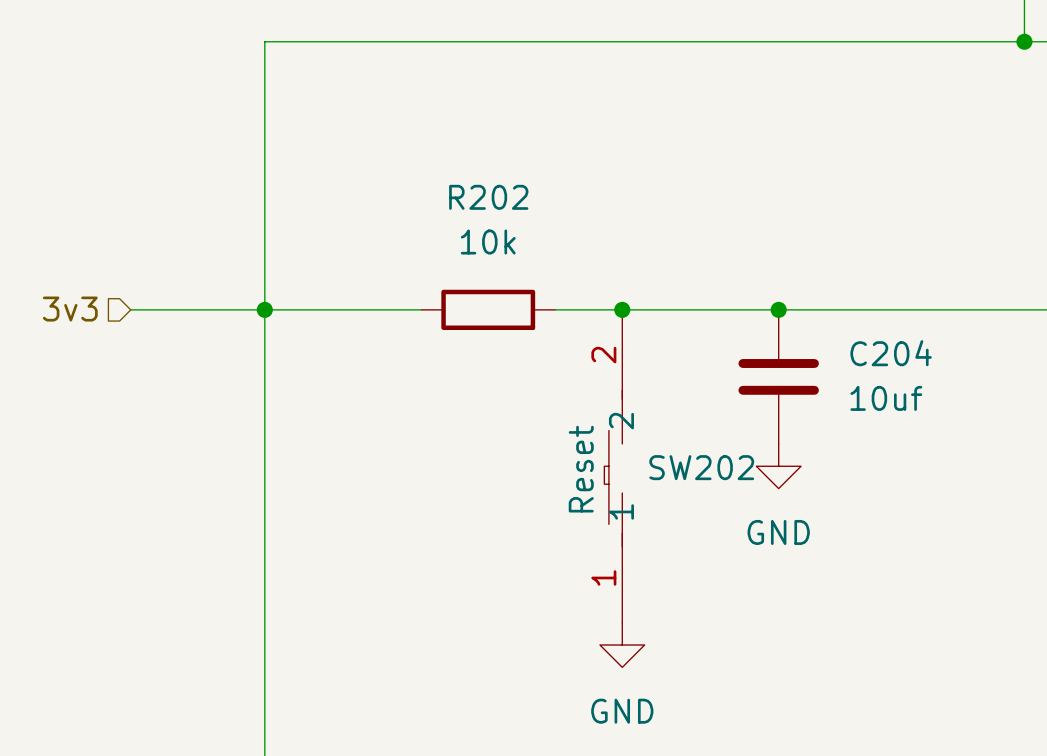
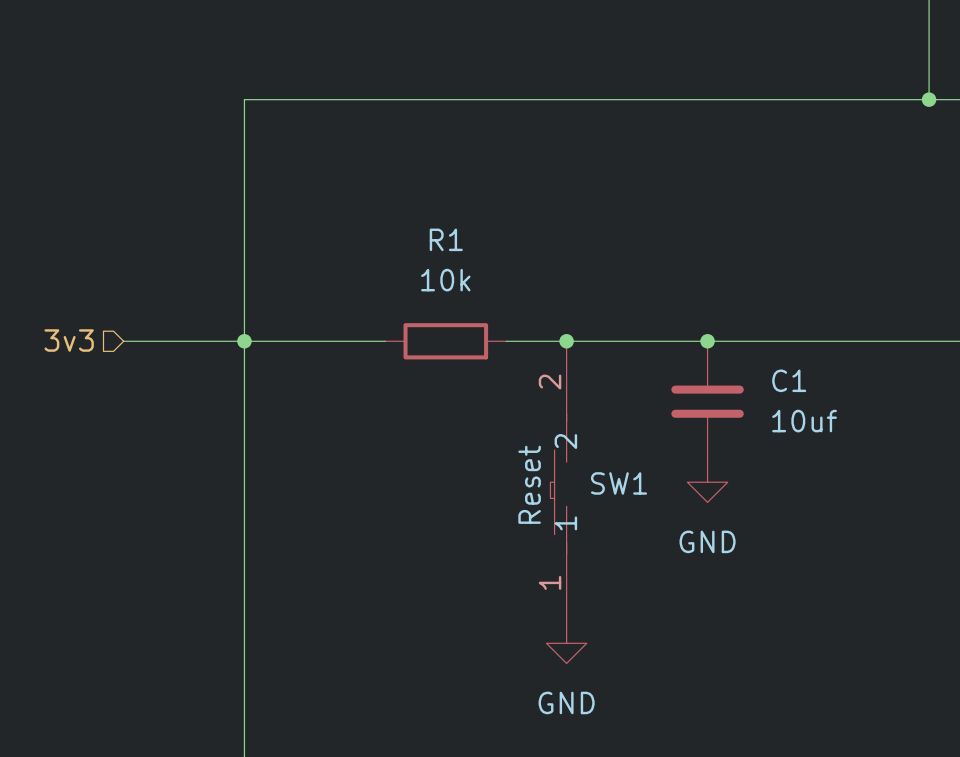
R202 name: R202 (488, 197) -> R1 (446, 239)
C204 name: C204 (891, 353) -> C1 (789, 380)
SW202 name: SW202 (701, 467) -> SW1 (619, 483)

